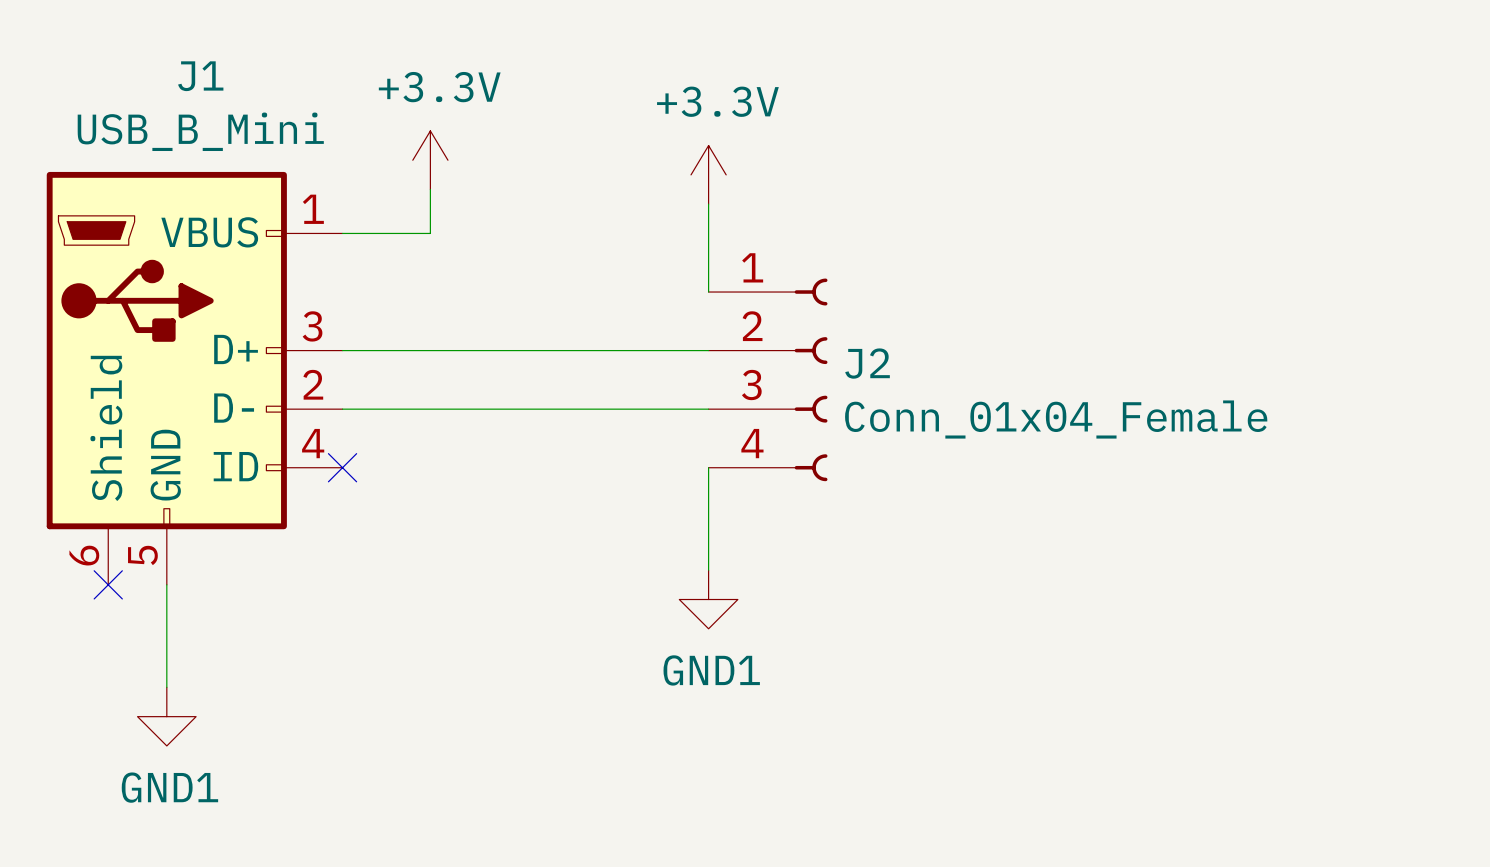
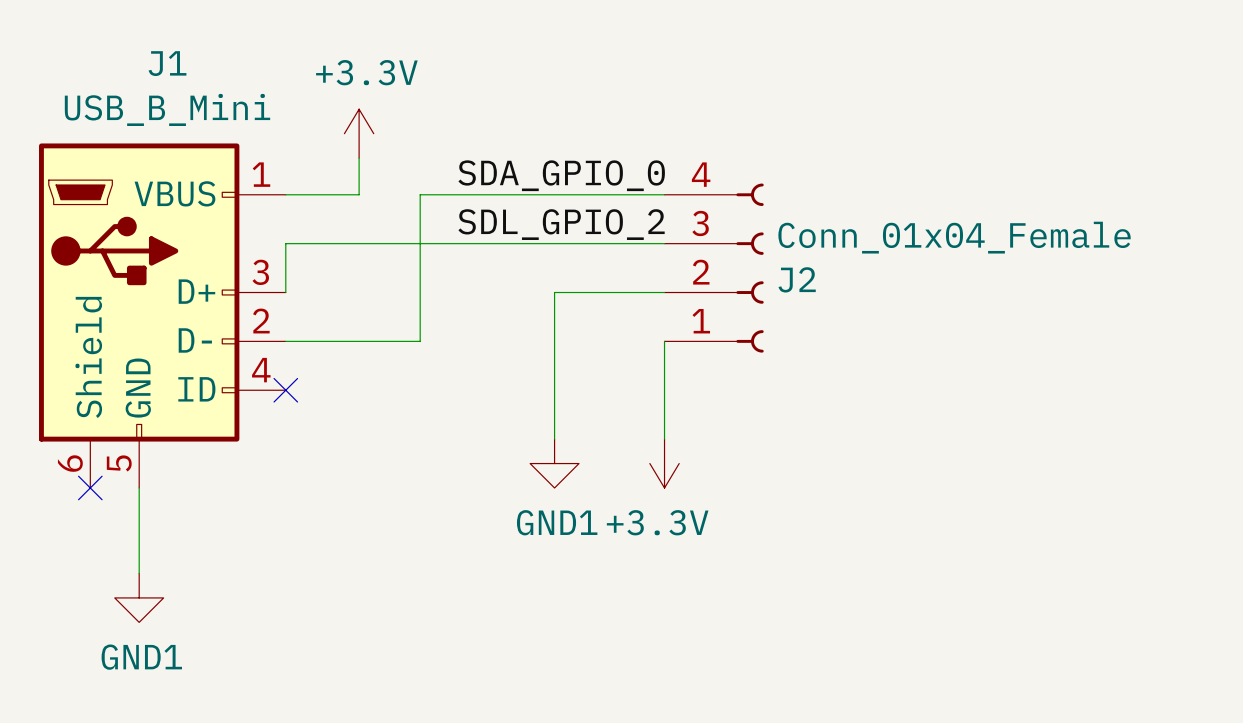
power symbol rotation: 0° (708, 174) -> 180° (664, 463)
power symbol position: +3.3V (708, 174) -> +3.3V (664, 463)
wire: (708, 204) (708, 292) -> none
label: none -> SDA_GPIO_0 (561, 175)
label: none -> SDL_GPIO_2 (561, 224)
wire: (342, 350) (664, 350) -> (285, 292) (285, 243) (664, 243)
wire: none -> (554, 292) (554, 439)
J2 flip: as is (811, 379) -> up-down (750, 268)
wire: (503, 409) (708, 409) -> (420, 341) (420, 194) (664, 194)
wire: none -> (664, 341) (664, 439)
wire: (708, 467) (708, 570) -> none
power symbol position: GND1 (708, 599) -> GND1 (554, 463)

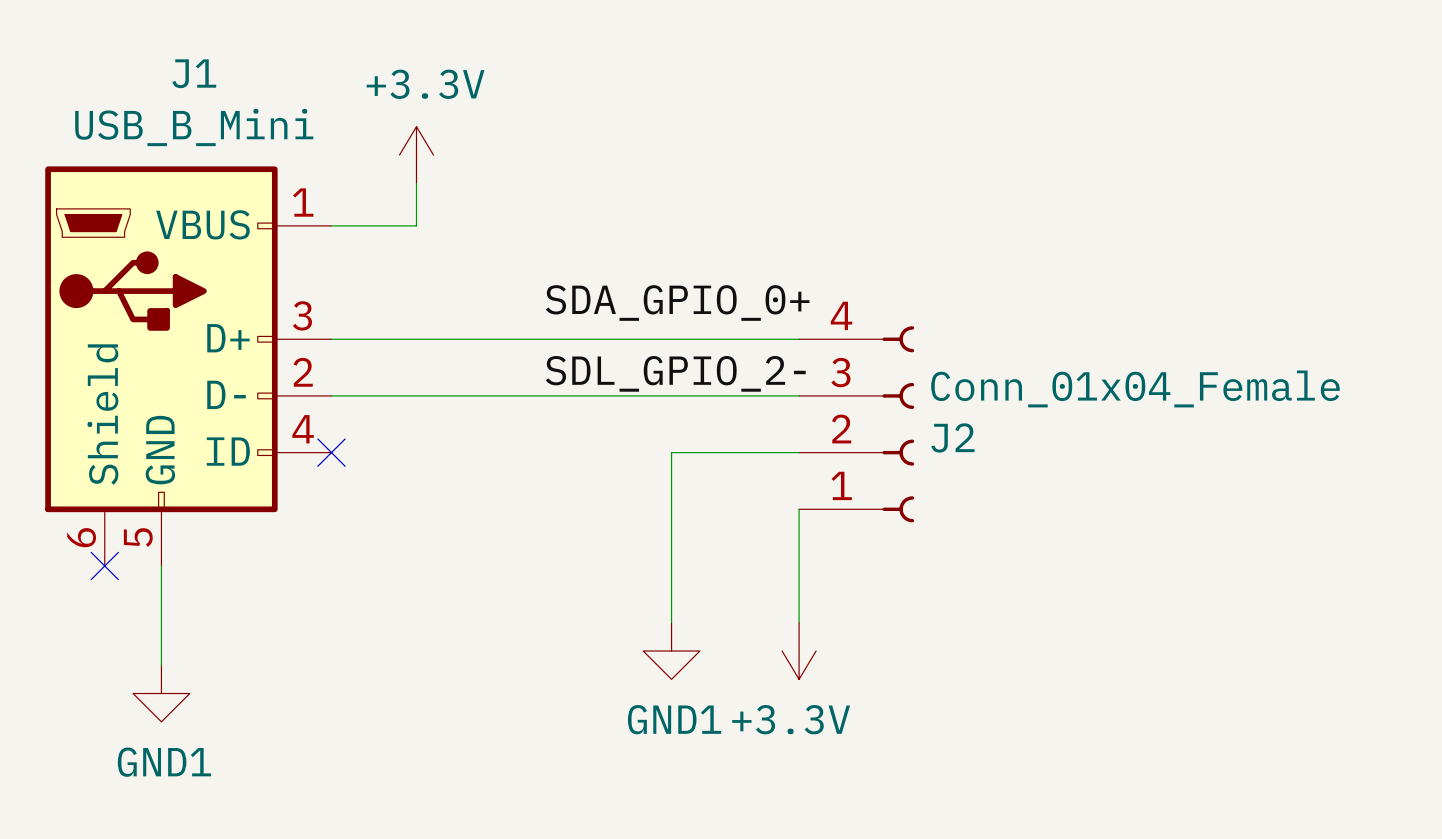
label: SDA_GPIO_0 (561, 175) -> none
wire: (664, 194) (420, 194) (420, 341) -> (799, 395) (487, 395)
label: SDL_GPIO_2 (561, 224) -> SDA_GPIO_0+ (677, 303)
wire: (664, 243) (285, 243) (285, 292) -> (643, 339) (331, 339)
J2 position: (714, 268) -> (856, 424)
wire: (554, 292) (554, 439) -> none
label: none -> SDL_GPIO_2- (675, 373)
wire: (664, 341) (664, 439) -> (799, 509) (799, 622)
wire: none -> (799, 452) (671, 452) (671, 622)
power symbol position: GND1 (554, 463) -> GND1 (671, 651)
power symbol position: +3.3V (664, 463) -> +3.3V (799, 651)

